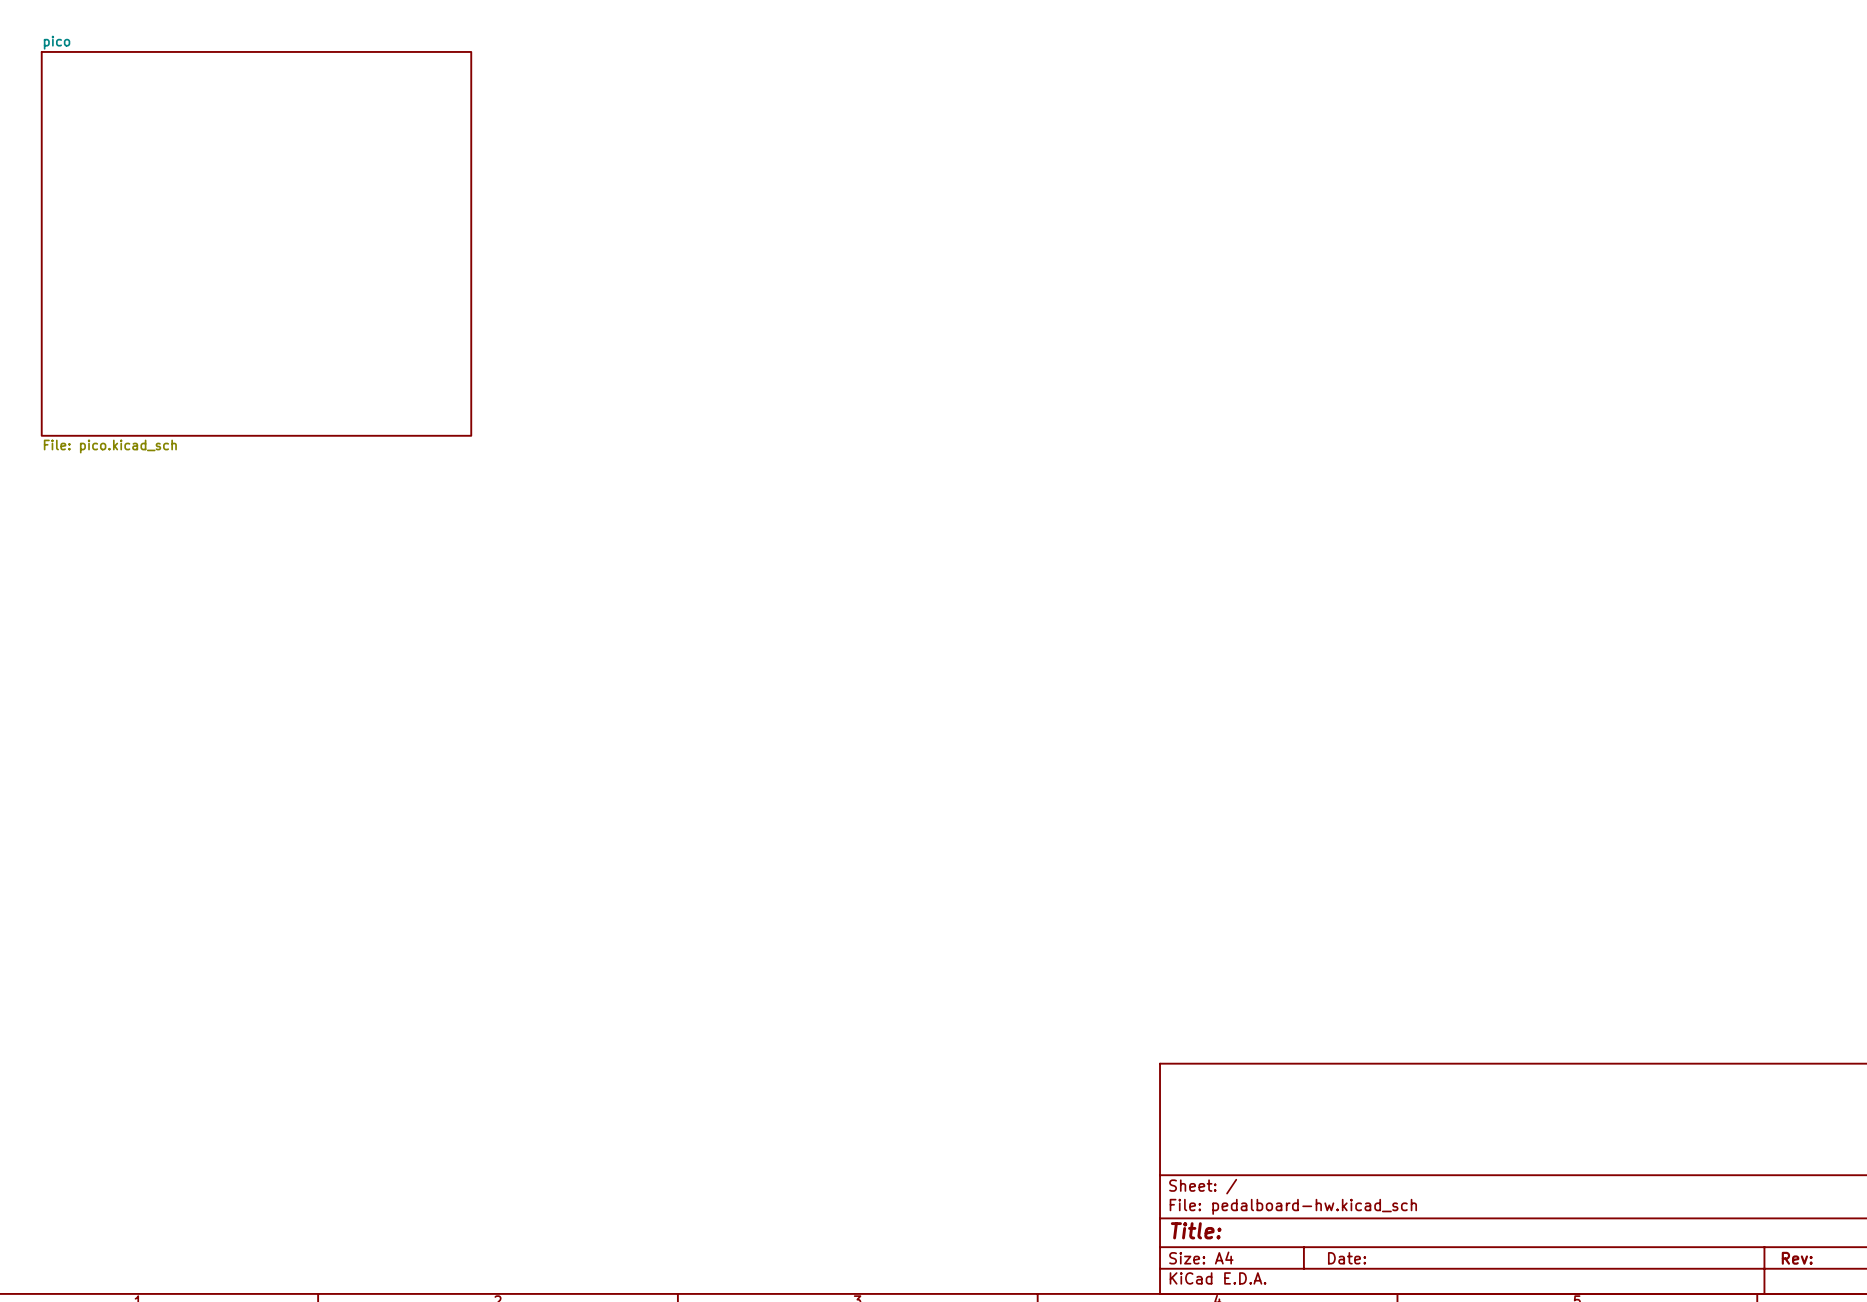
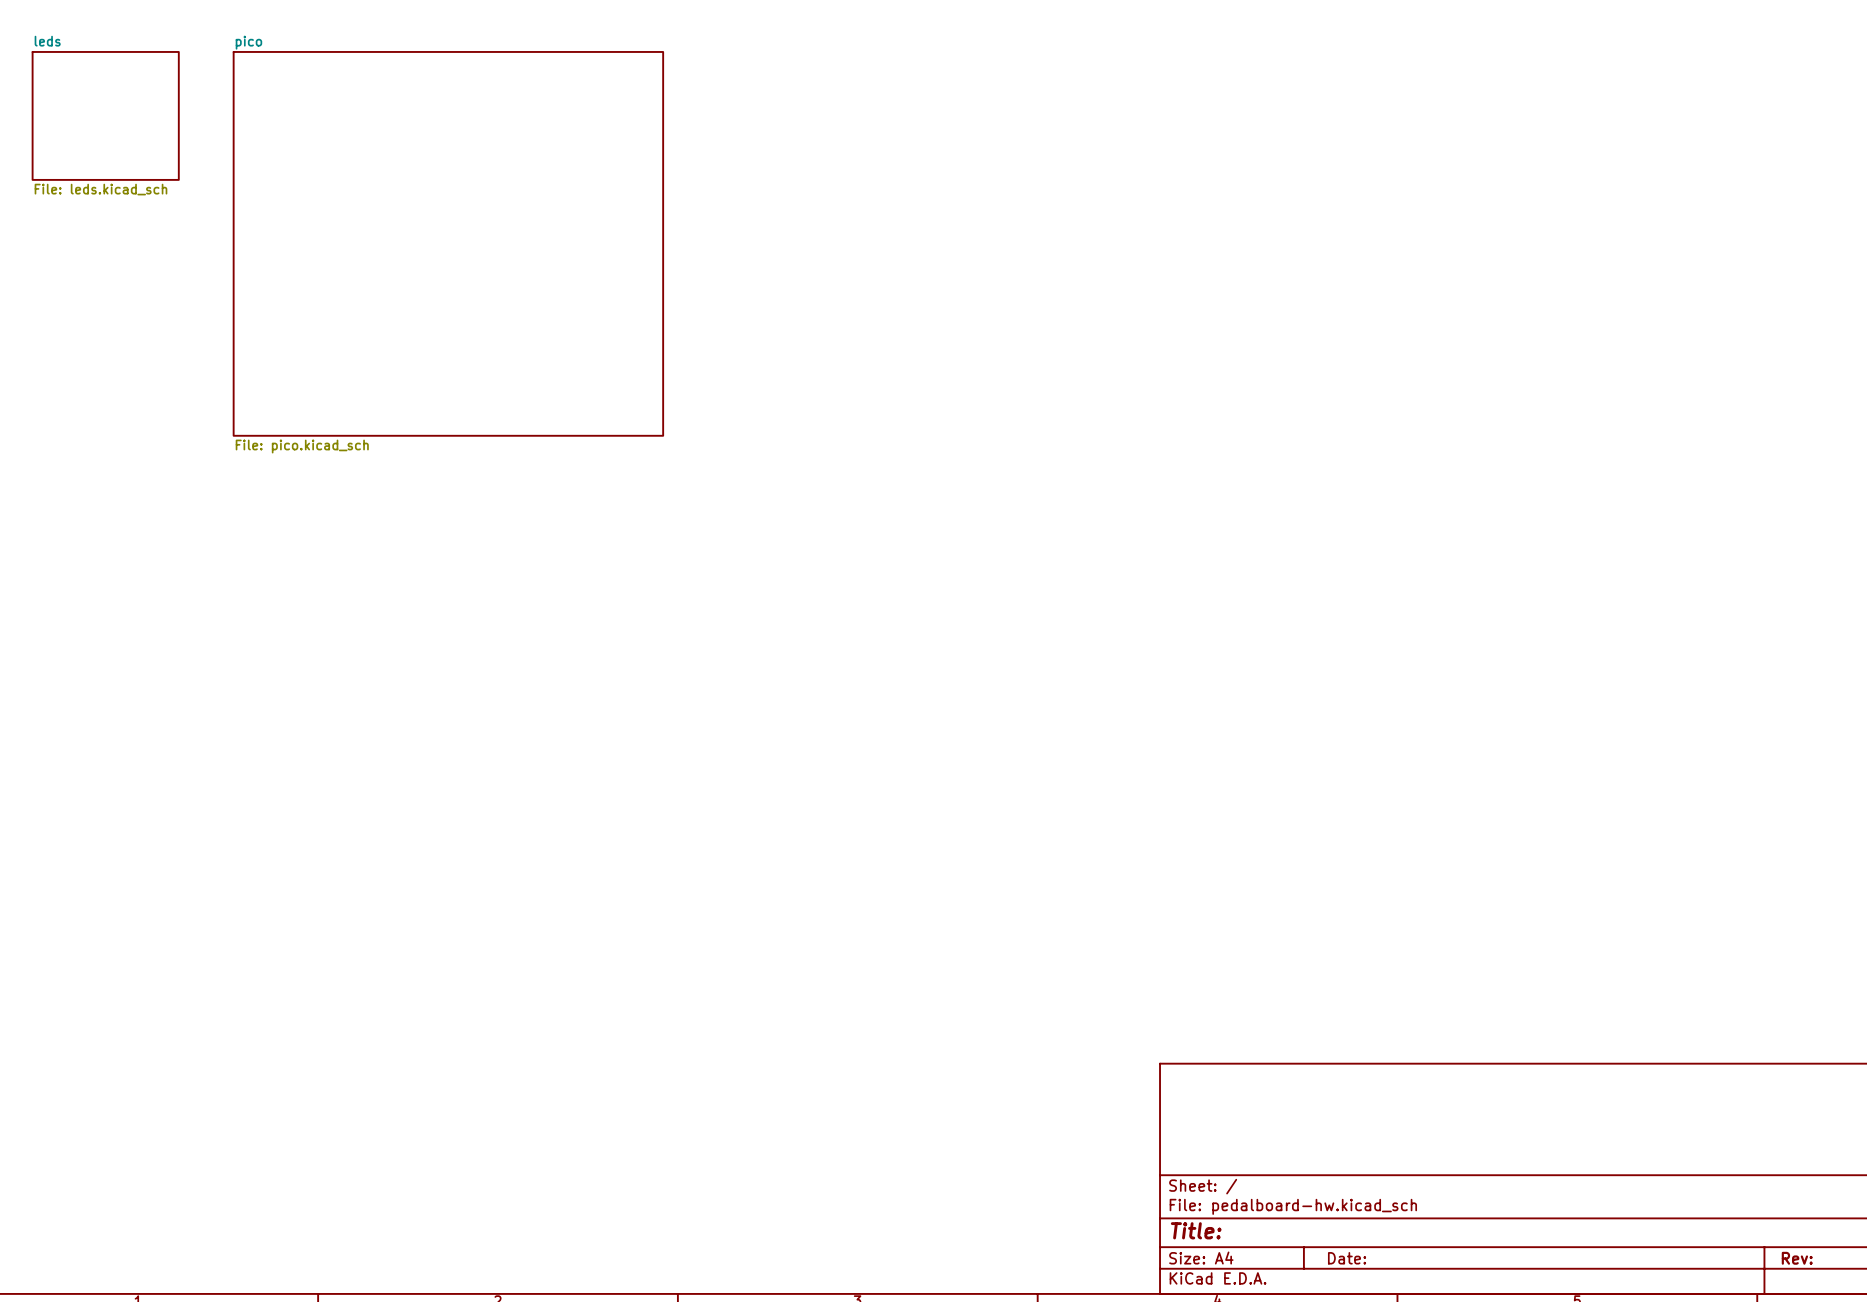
sheet leds: none -> File: leds.kicad_sch (105, 115)
sheet pico: File: pico.kicad_sch (256, 243) -> none
sheet pico: none -> File: pico.kicad_sch (448, 243)

